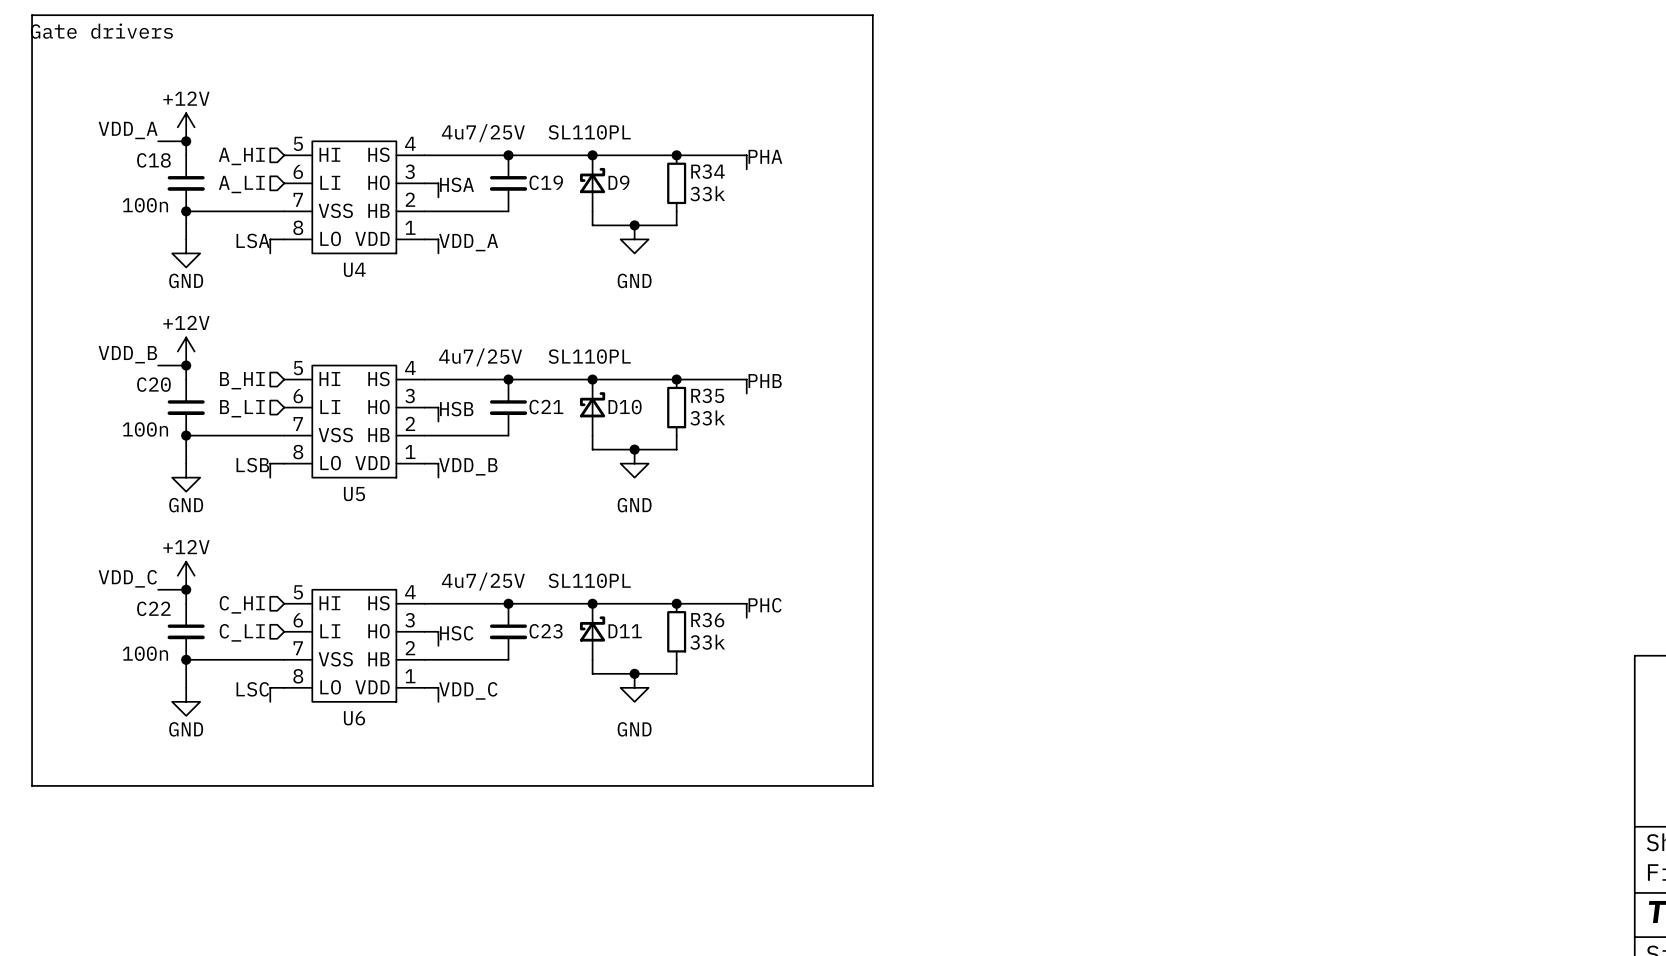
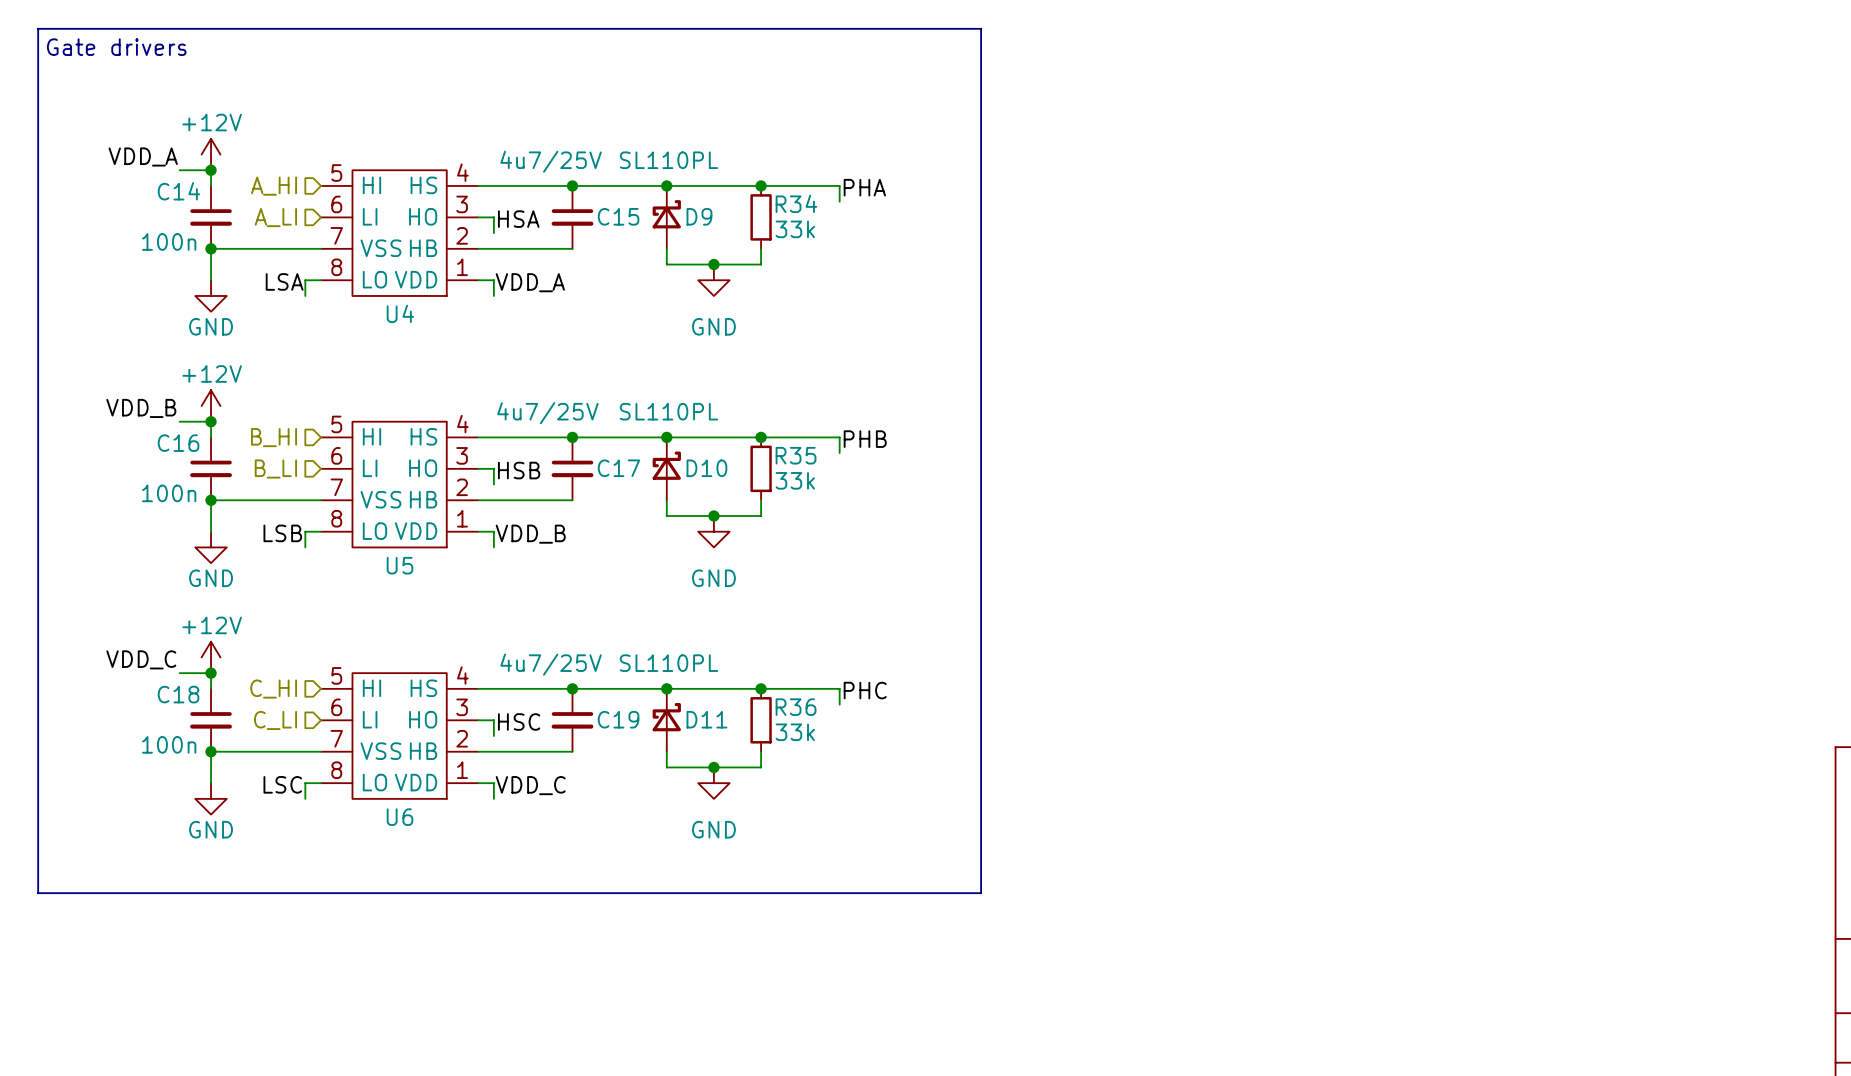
C18 name: C18 (153, 160) -> C14 (178, 191)
C19 name: C19 (546, 182) -> C15 (618, 216)
C20 name: C20 (153, 384) -> C16 (178, 443)
C21 name: C21 (546, 407) -> C17 (618, 468)
C22 name: C22 (153, 608) -> C18 (178, 694)
C23 name: C23 (546, 631) -> C19 (618, 719)

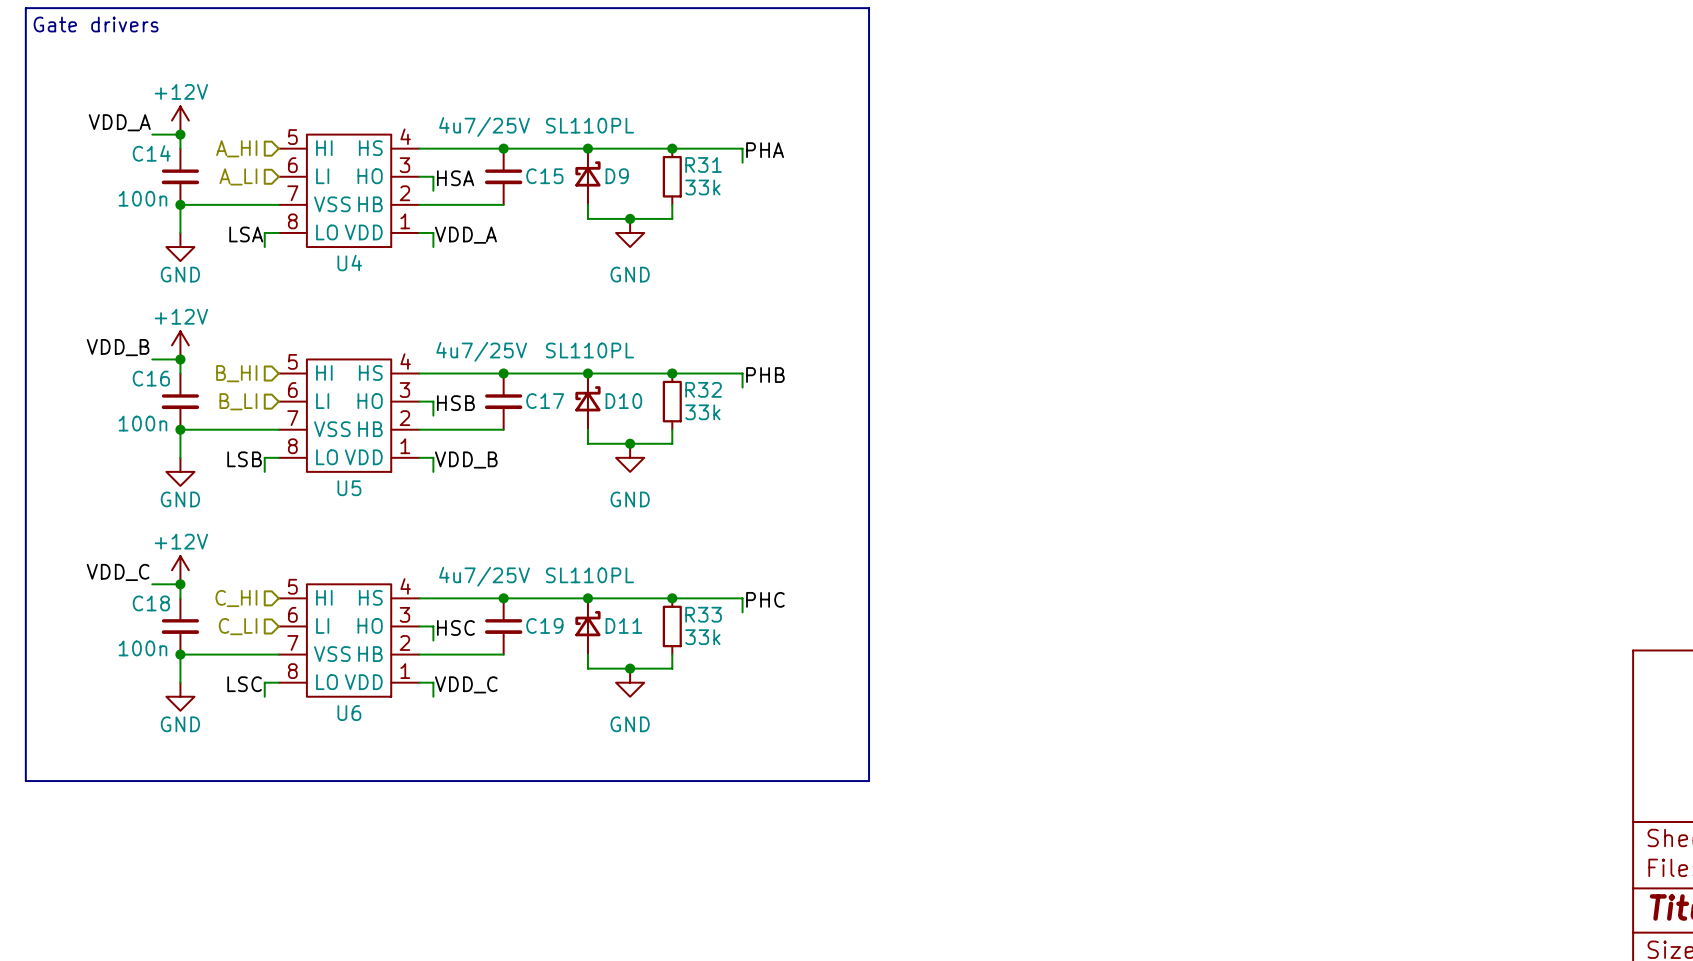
R34 name: R34 (796, 203) -> R31 (703, 164)
R35 name: R35 (796, 455) -> R32 (703, 389)
R36 name: R36 (796, 707) -> R33 (703, 614)

